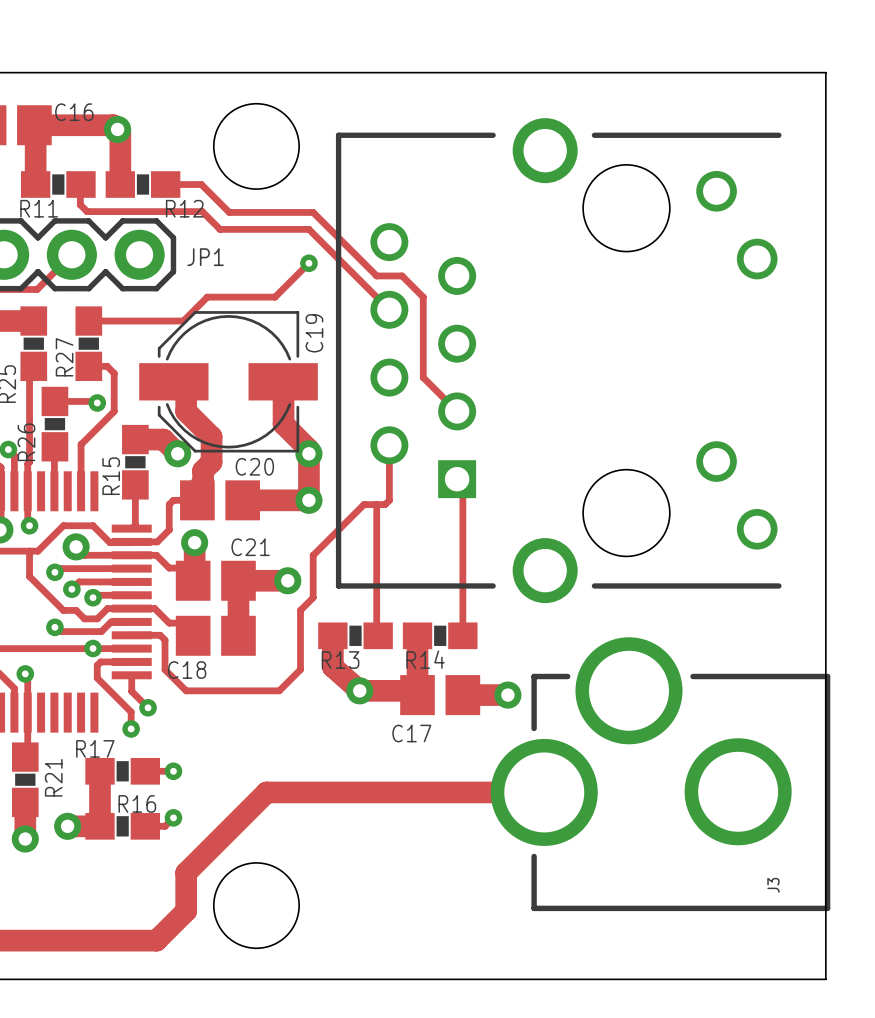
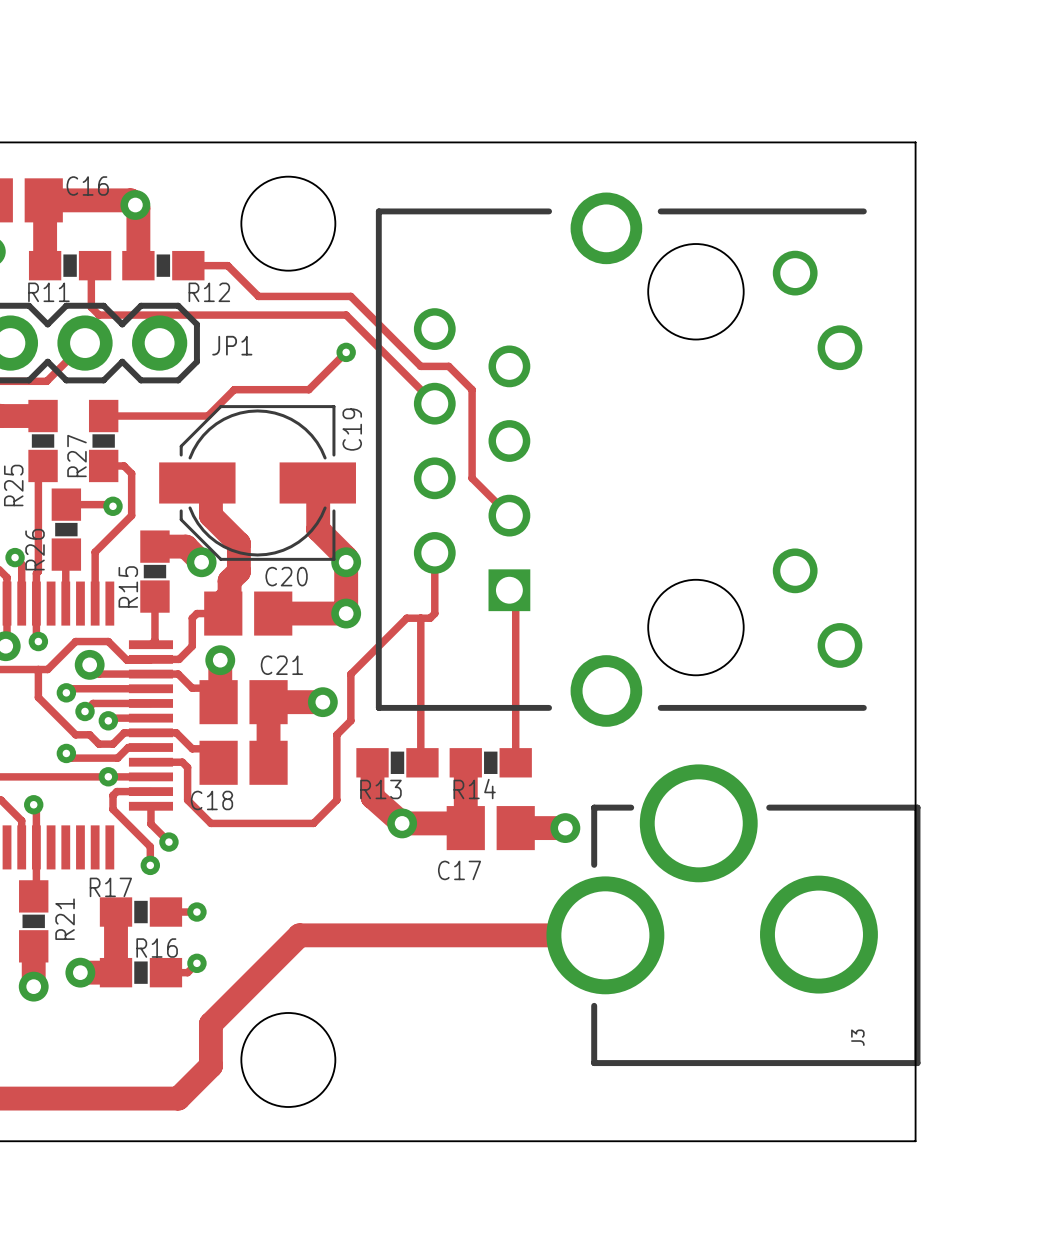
track: (80, 184) (80, 204) (87, 211) (202, 211) (220, 229) -> (91, 273) (91, 307) (99, 315) (248, 315)

